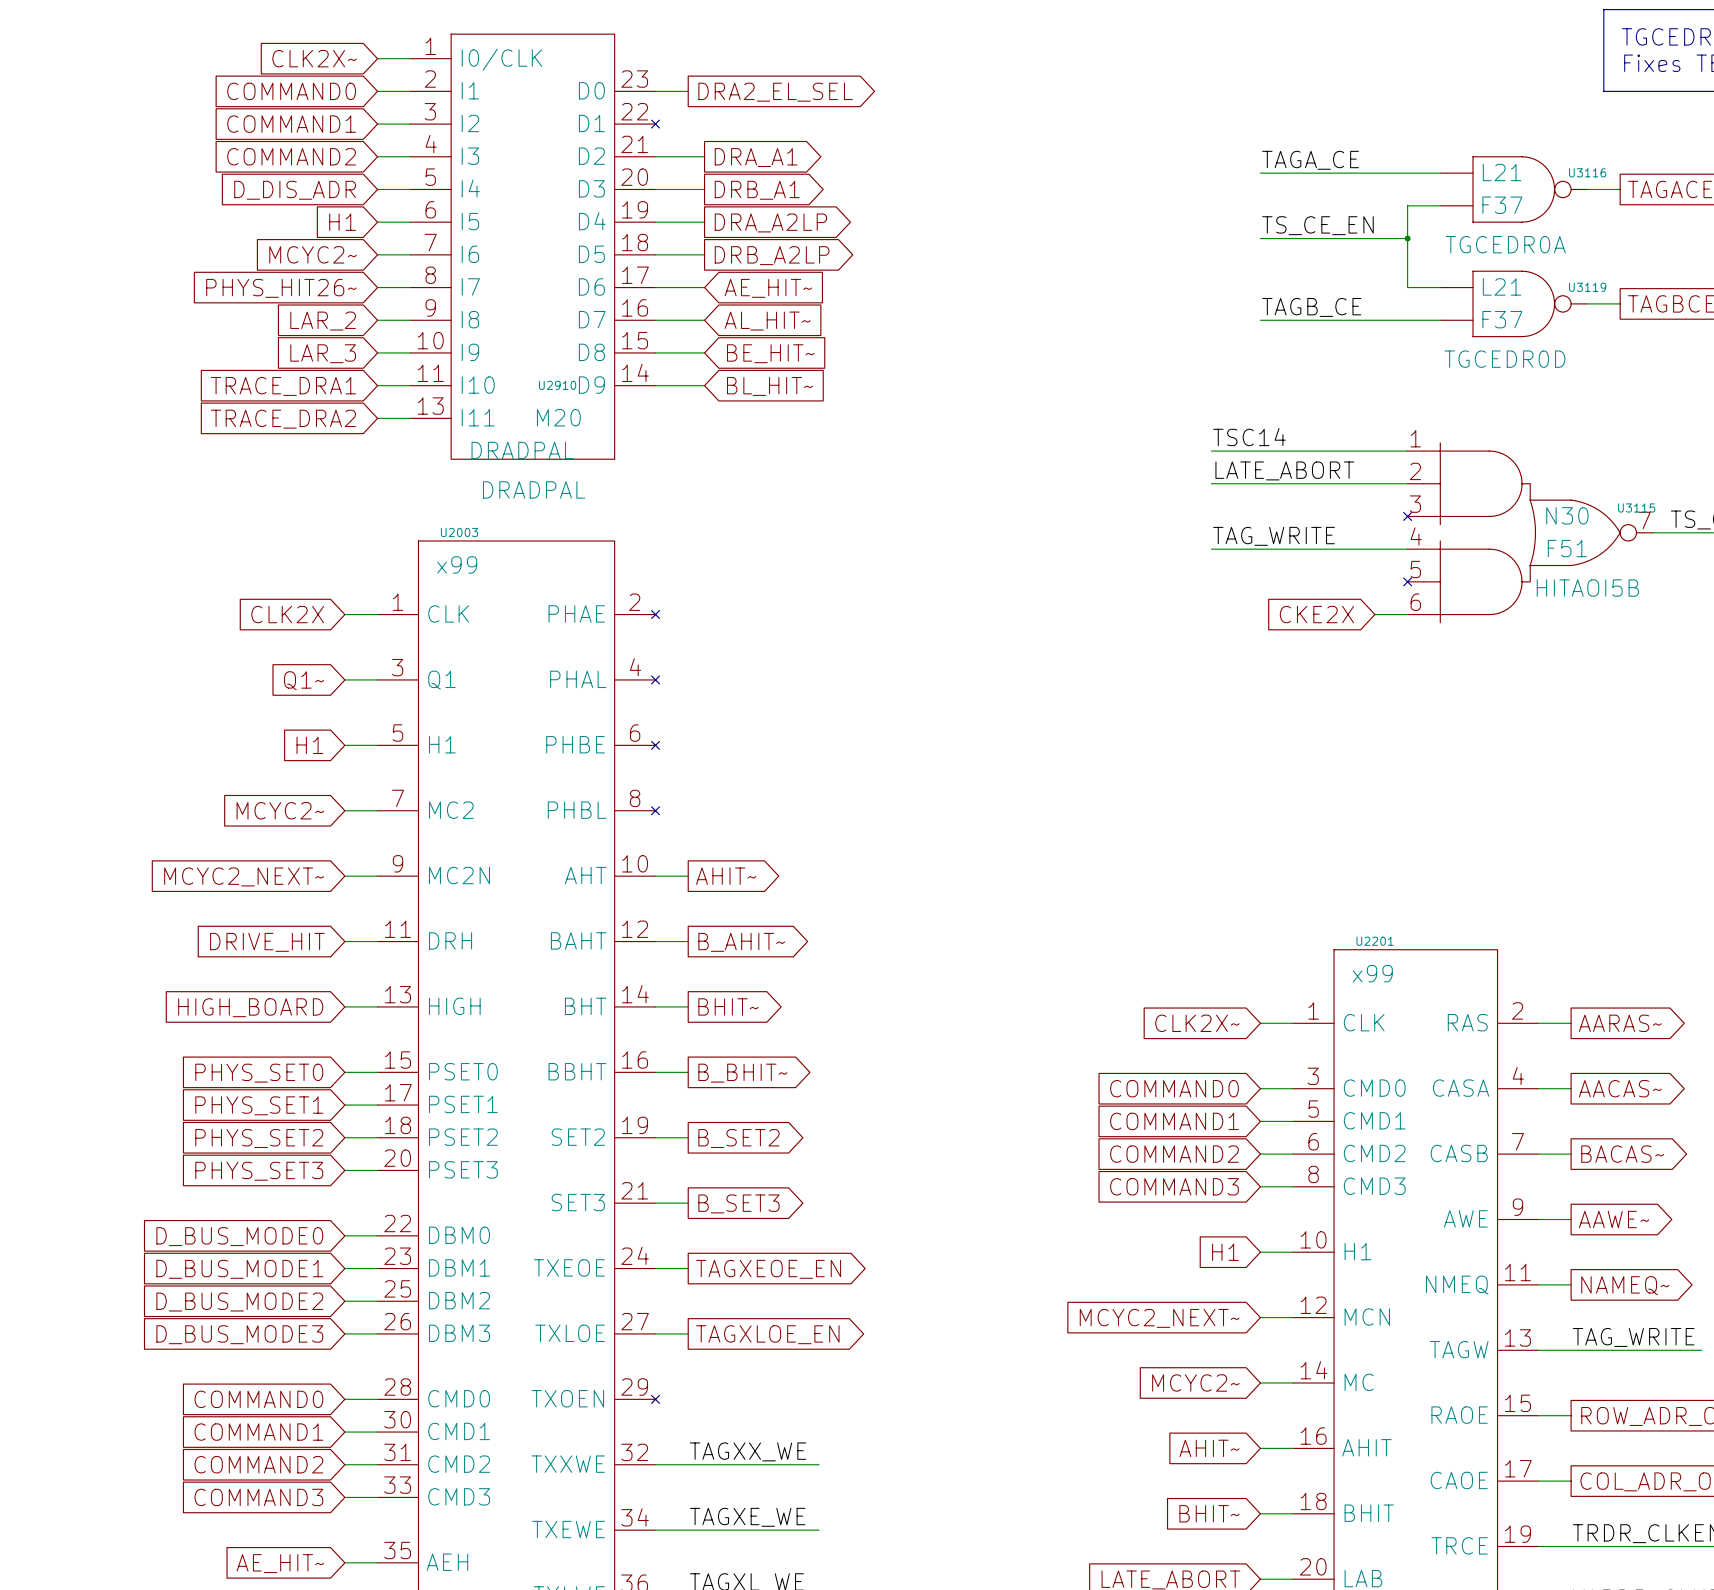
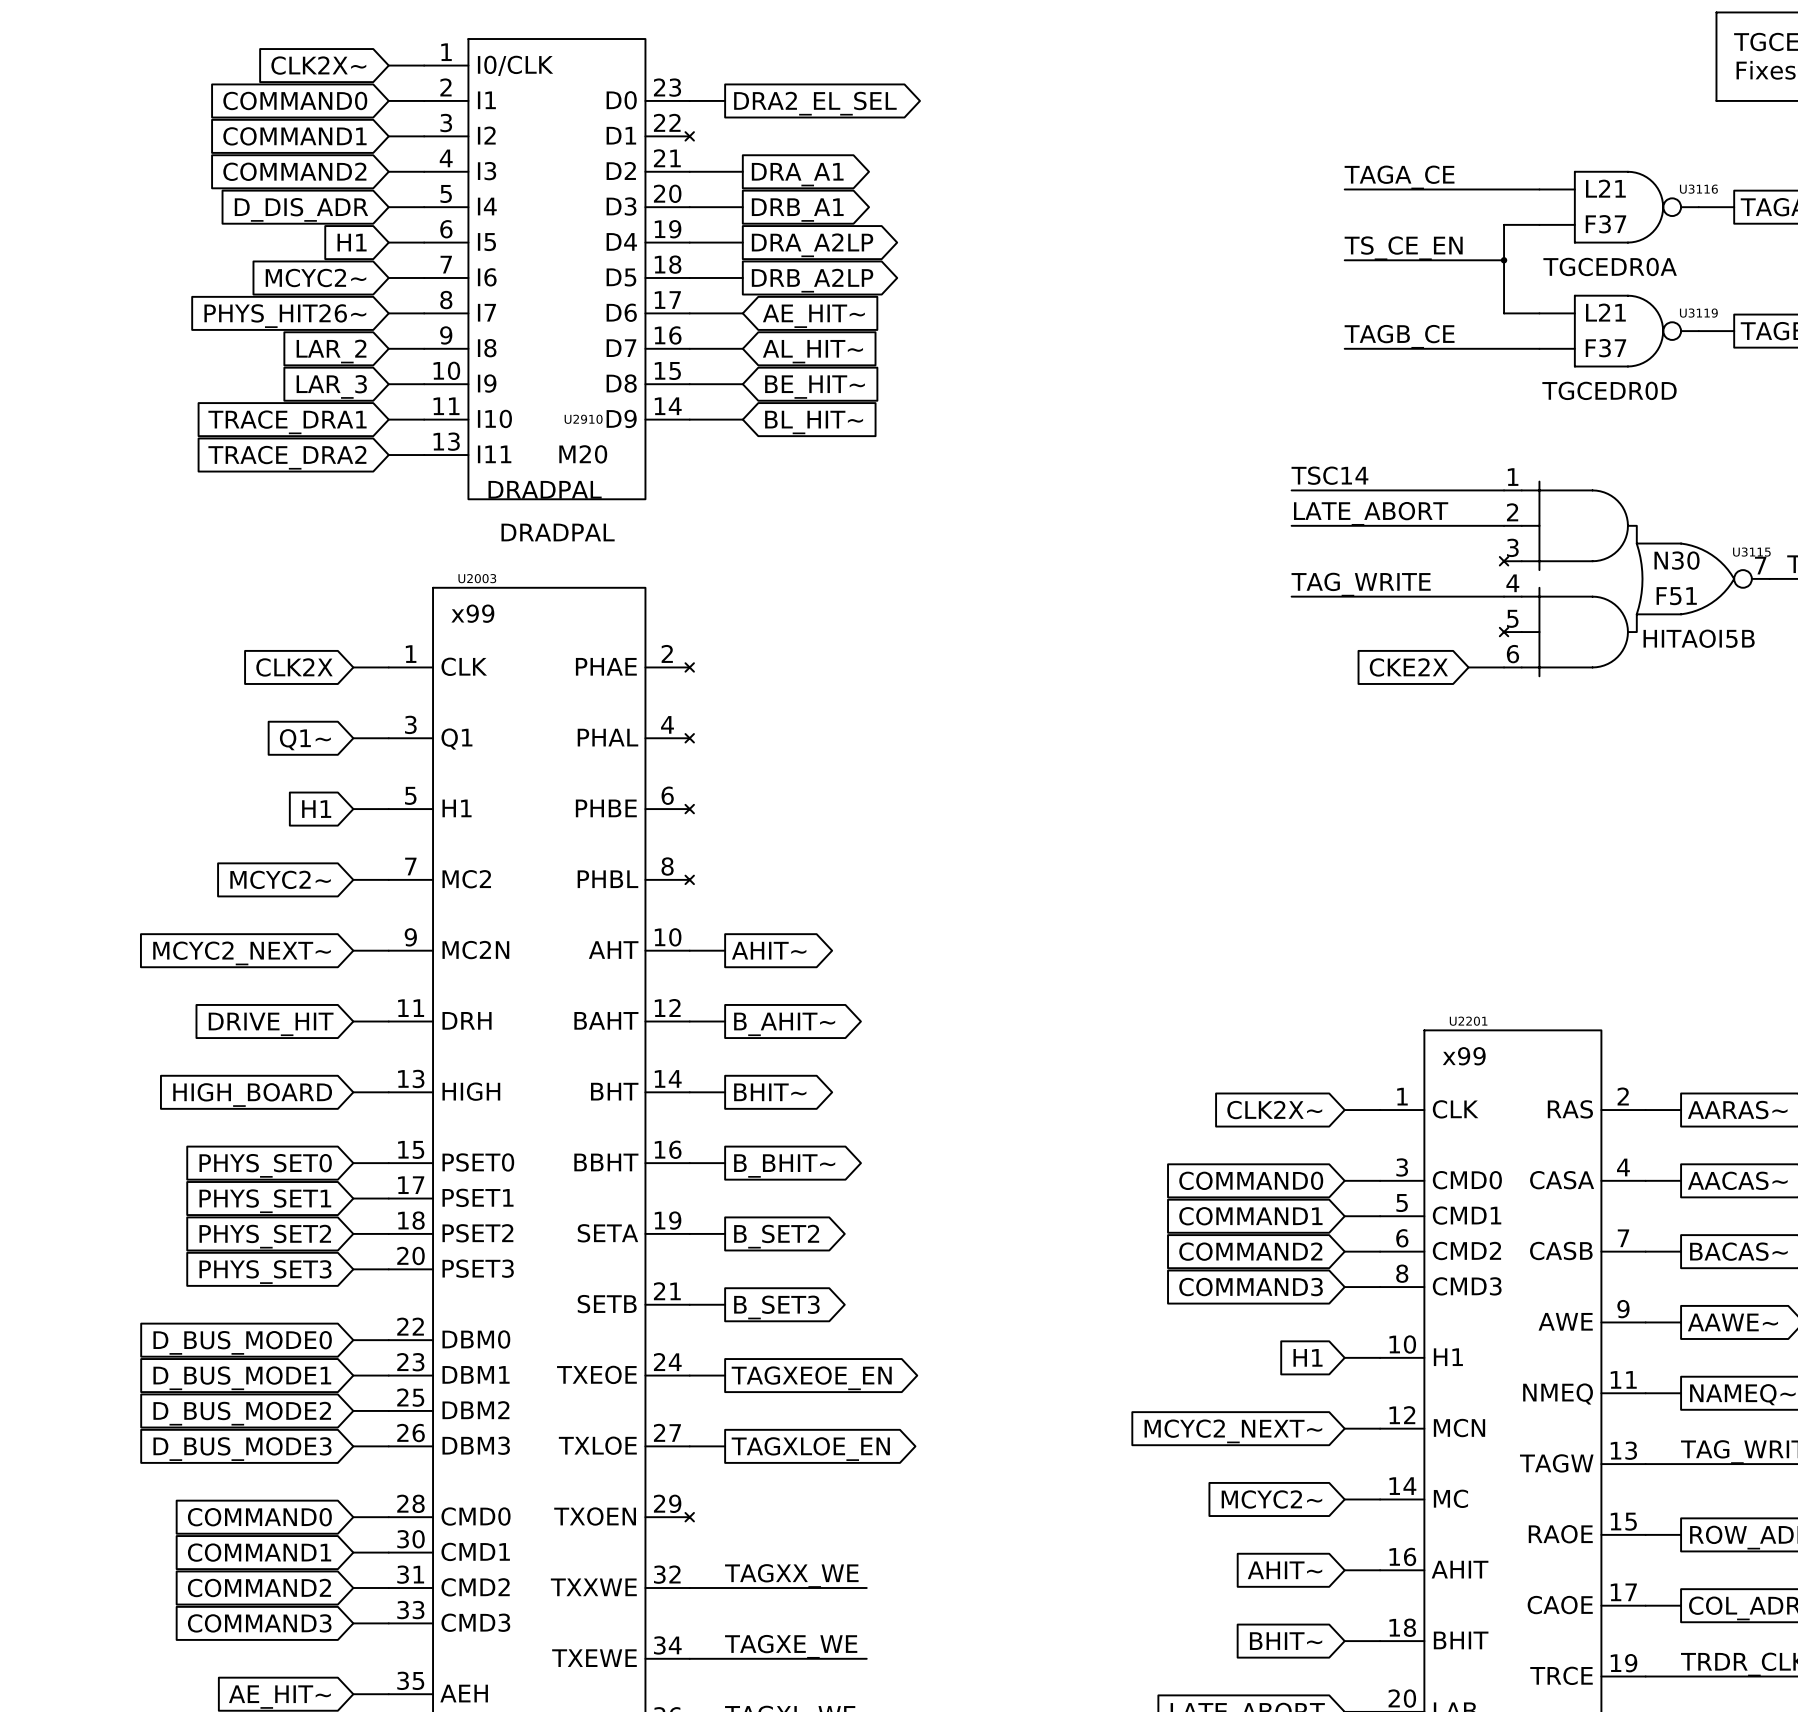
U2003 pin name: SET2 (578, 1137) -> SETA (607, 1233)
U2003 pin name: SET3 (578, 1202) -> SETB (607, 1304)

